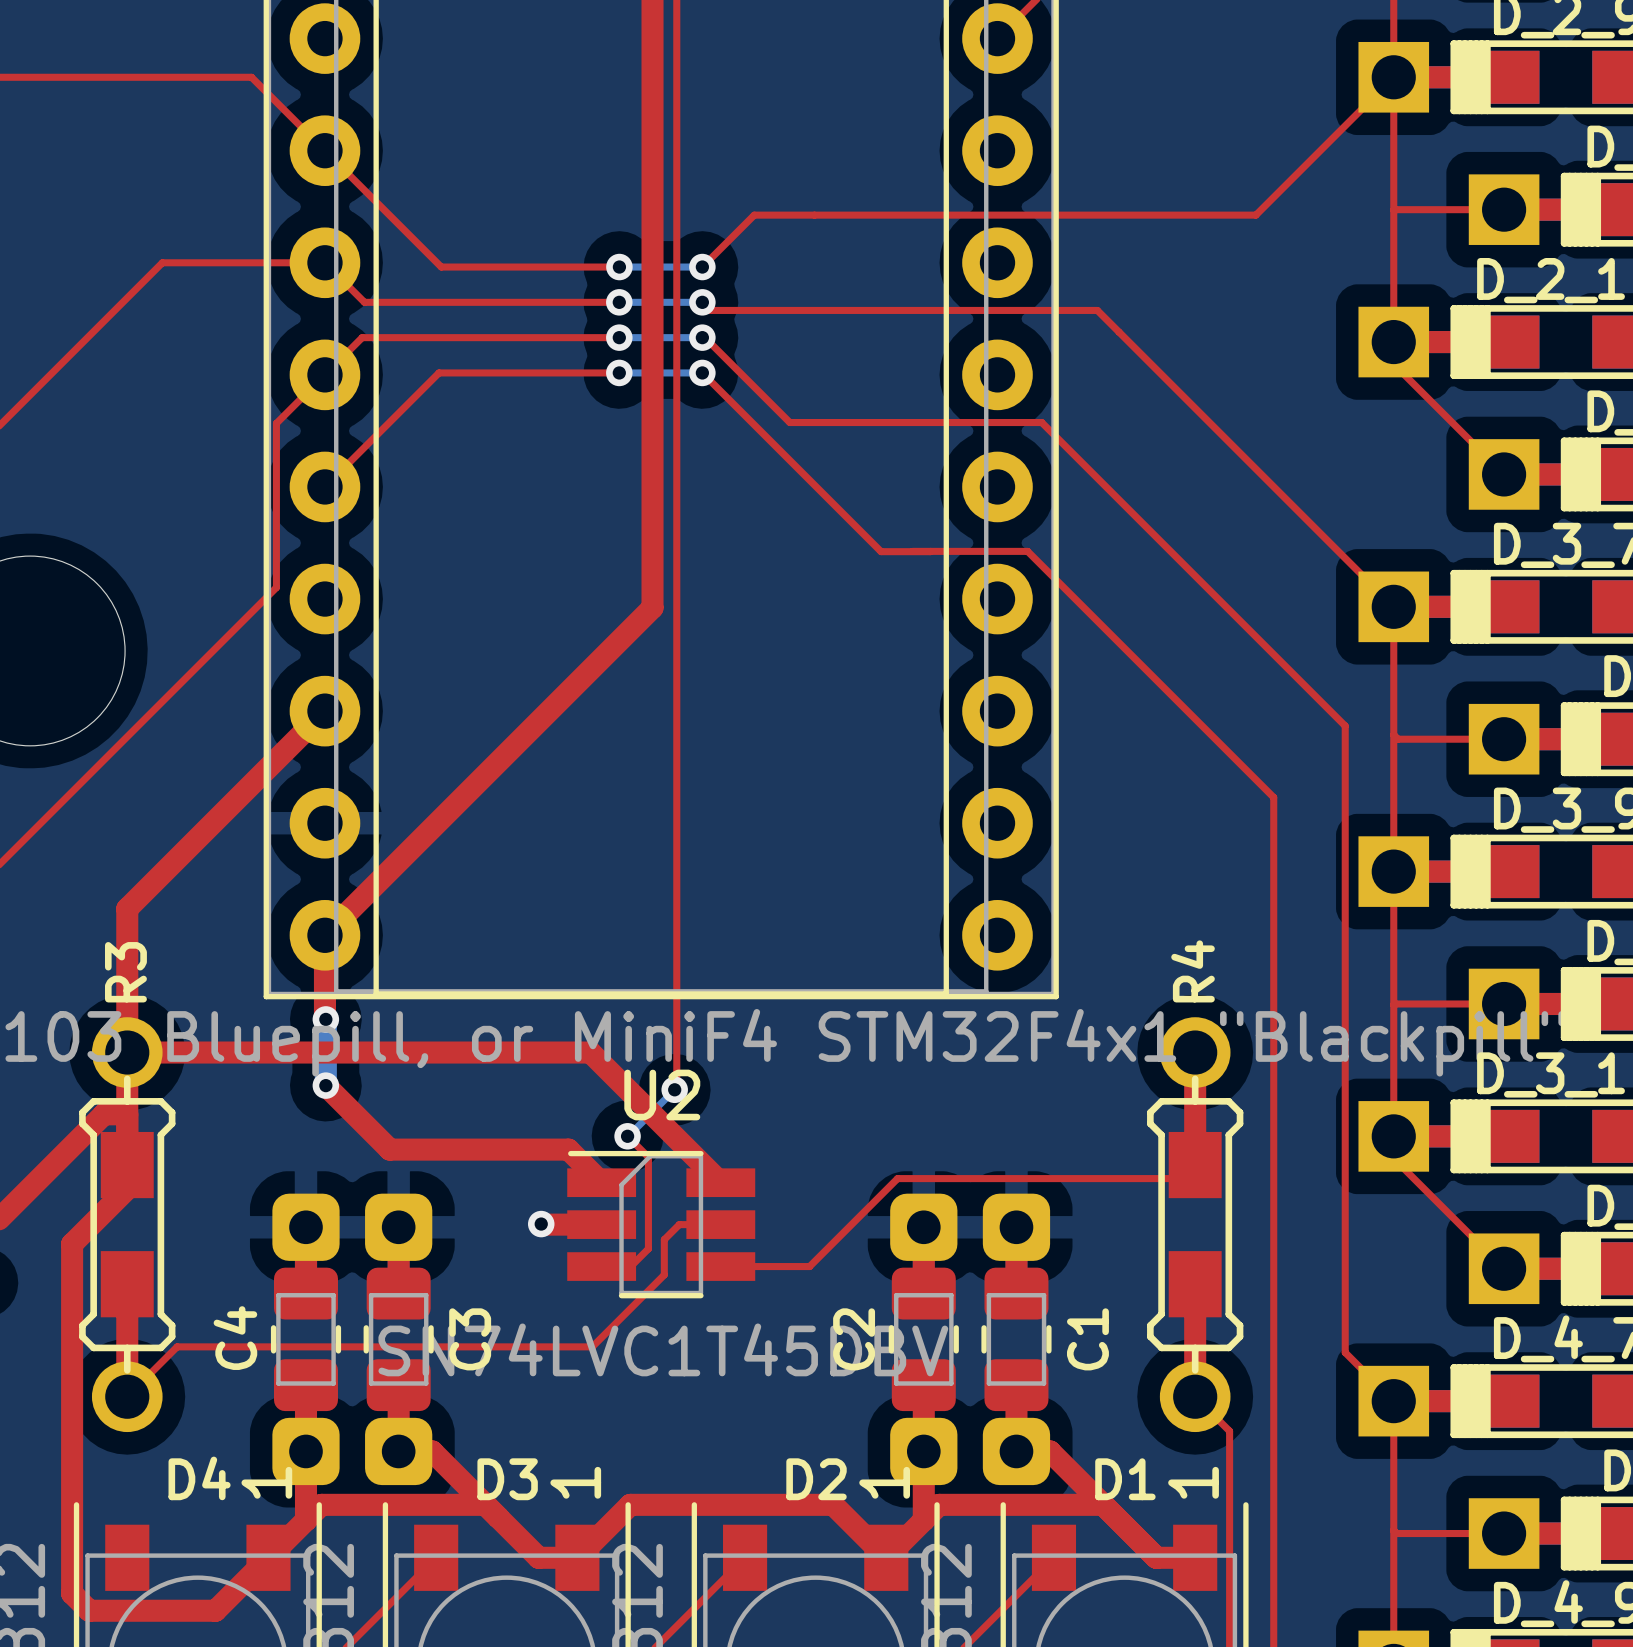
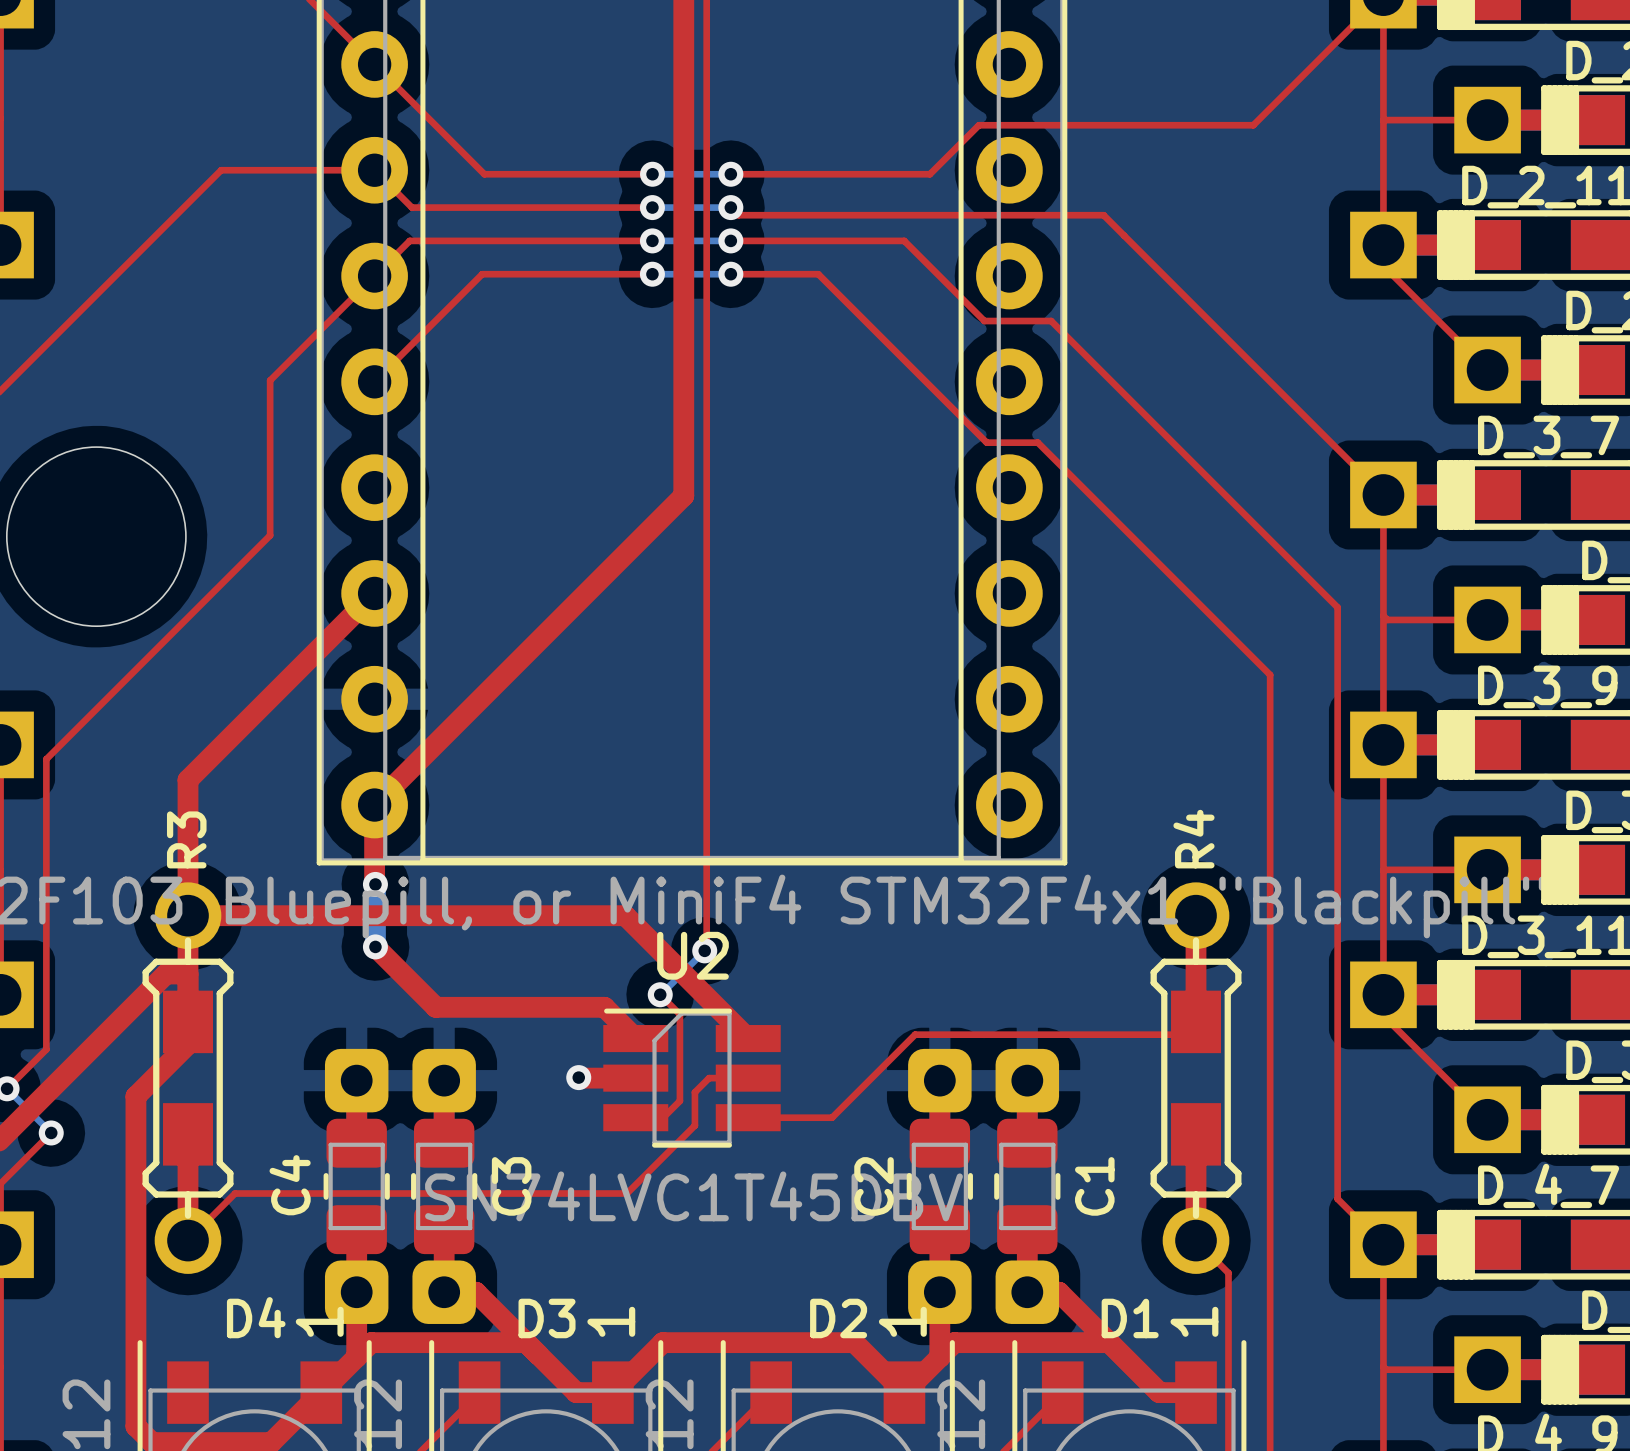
top track: (965, 215) (754, 215) (702, 267) -> (978, 125) (929, 174) (730, 174)
top track: (704, 337) (789, 422) (971, 422) -> (733, 240) (904, 240) (984, 321)
top track: (702, 372) (881, 551) (930, 551) -> (730, 274) (818, 274) (986, 442)
top track: (276, 423) (276, 587) (214, 649) -> (328, 321) (270, 380) (270, 535)
top track: (912, 551) (973, 551) -> none

